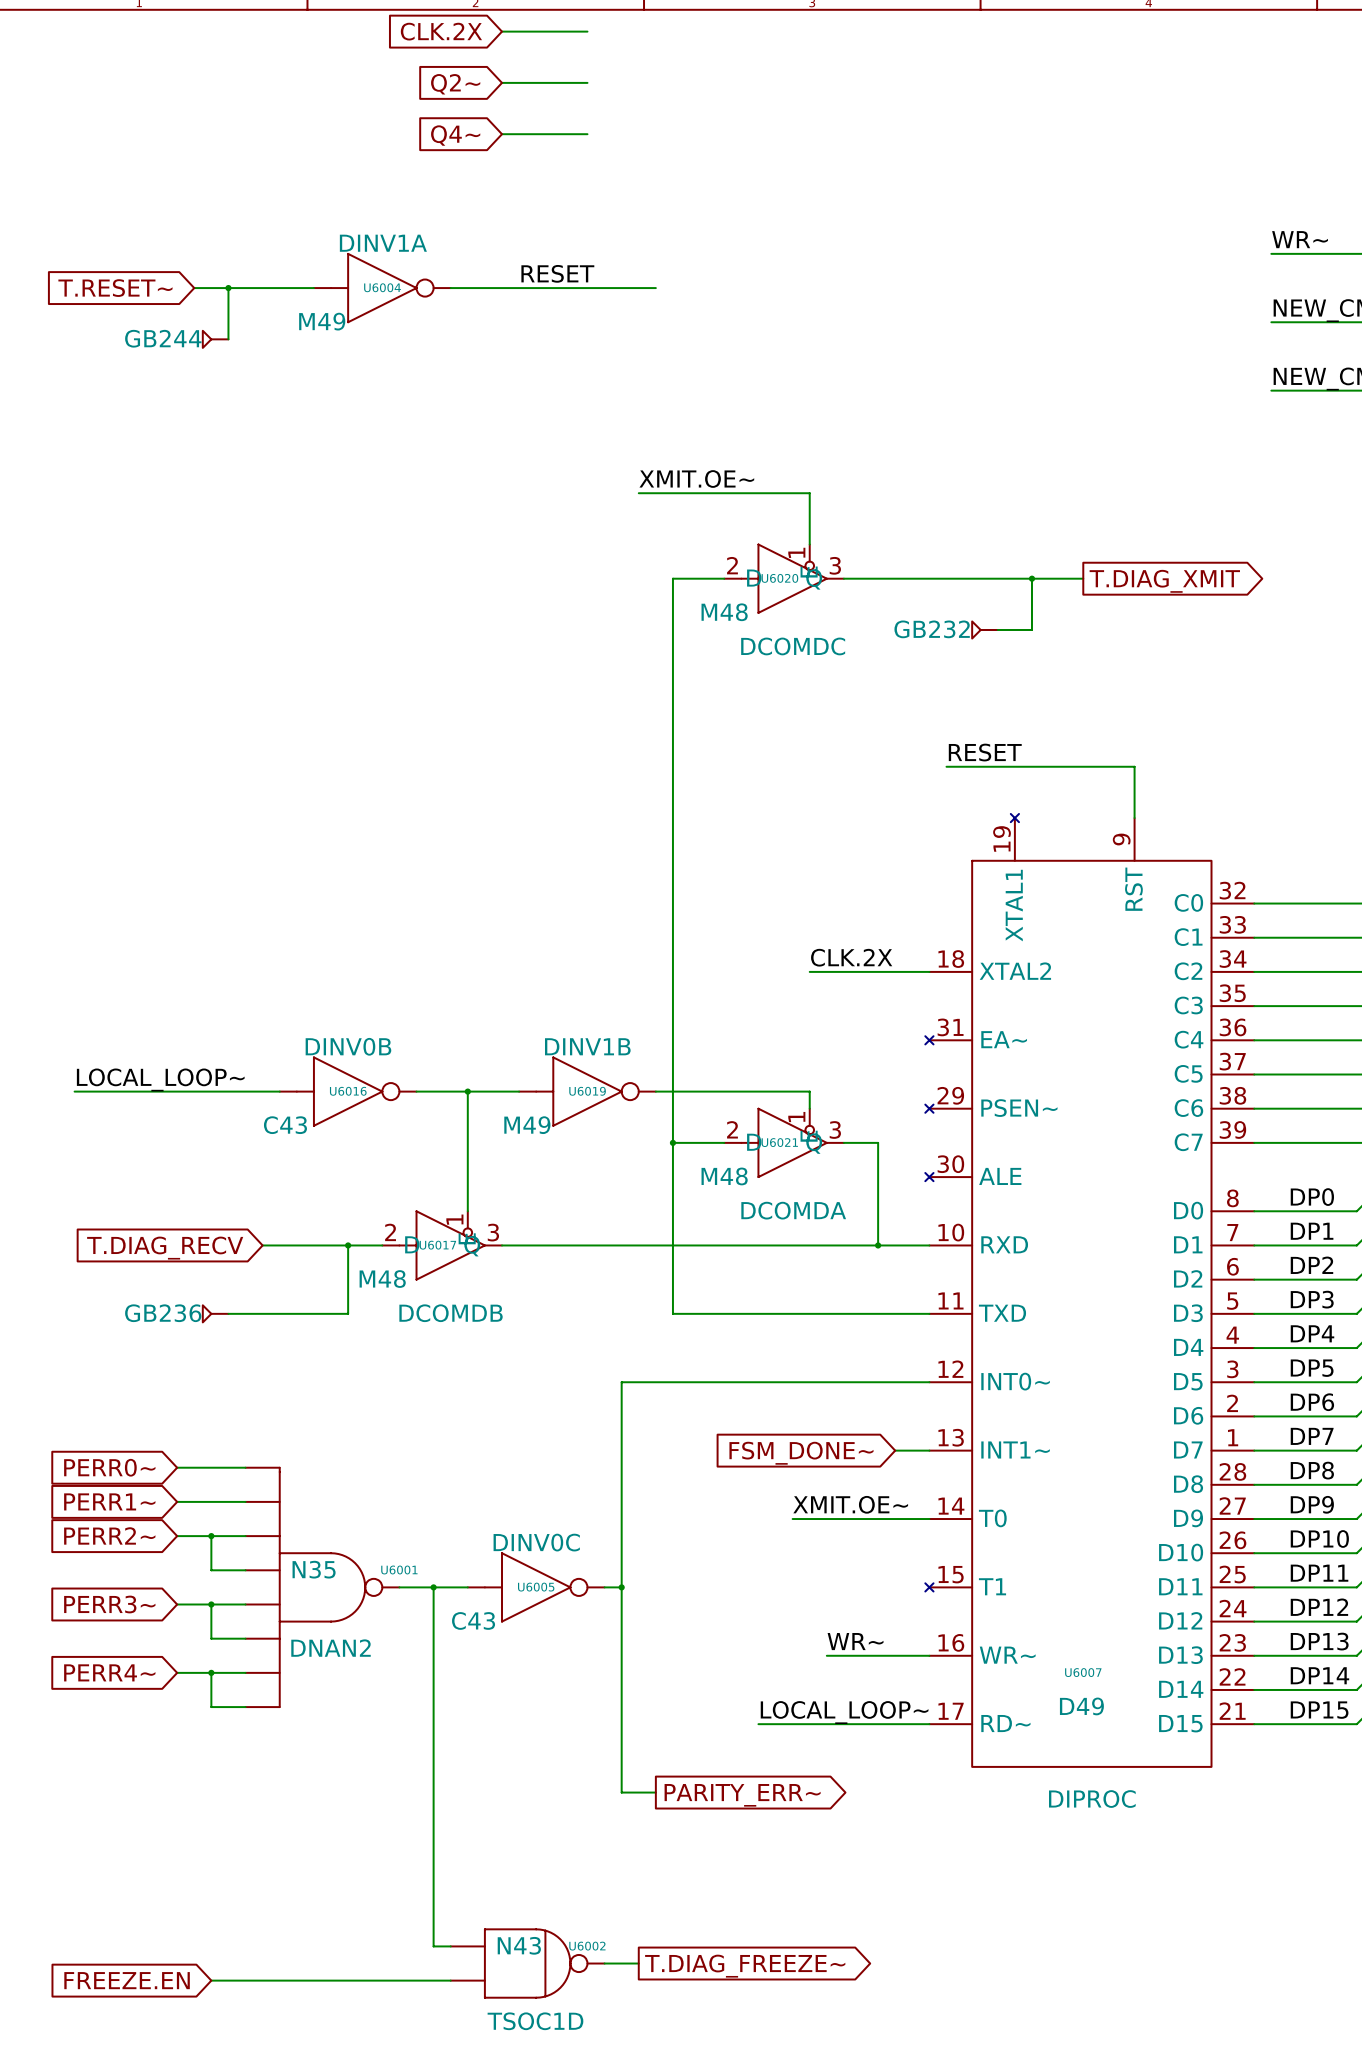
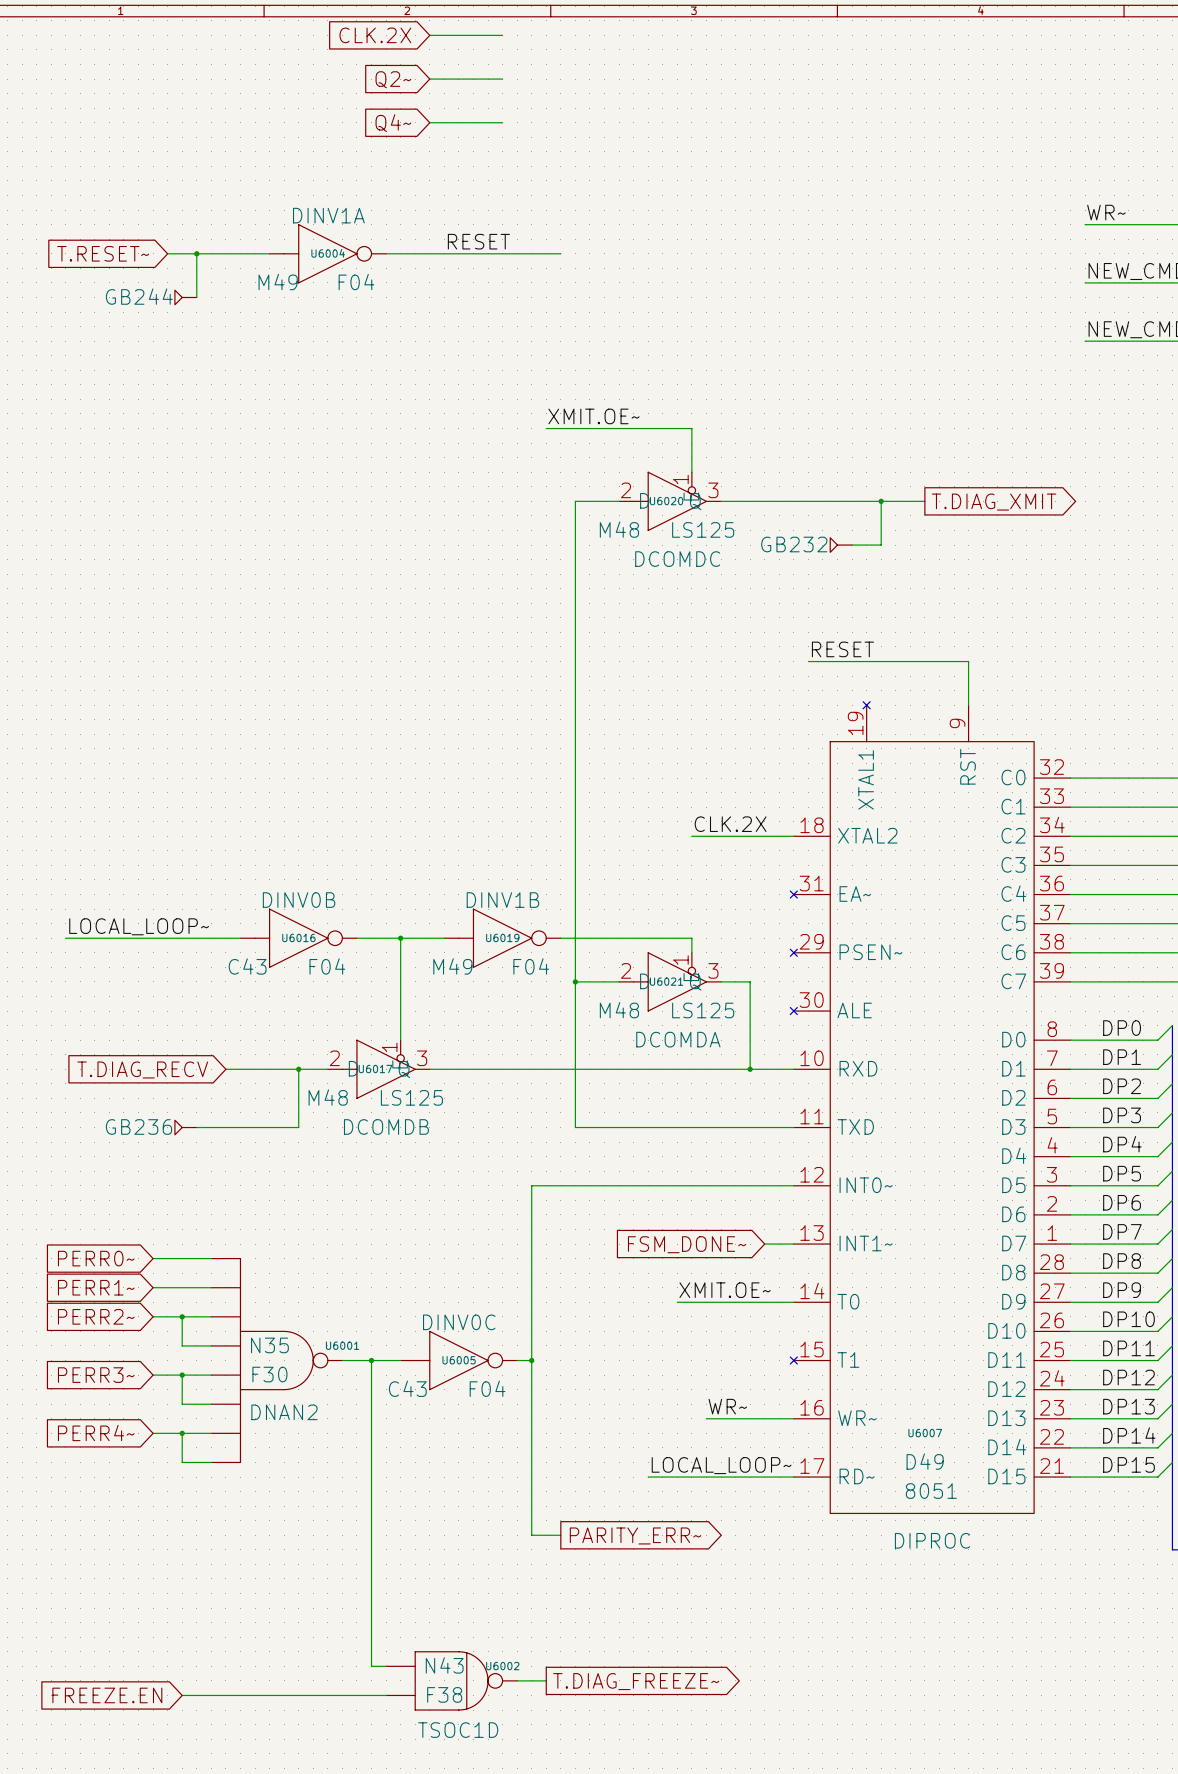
U6004 value: none -> F04 (356, 282)
U6020 value: none -> LS125 (703, 529)
U6016 value: none -> F04 (327, 966)
U6019 value: none -> F04 (531, 966)
U6021 value: none -> LS125 (703, 1010)
U6017 value: none -> LS125 (411, 1097)
U6001 value: none -> F30 (269, 1374)
U6005 value: none -> F04 (487, 1388)
U6007 value: none -> 8051 (931, 1491)
U6002 value: none -> F38 (444, 1694)

